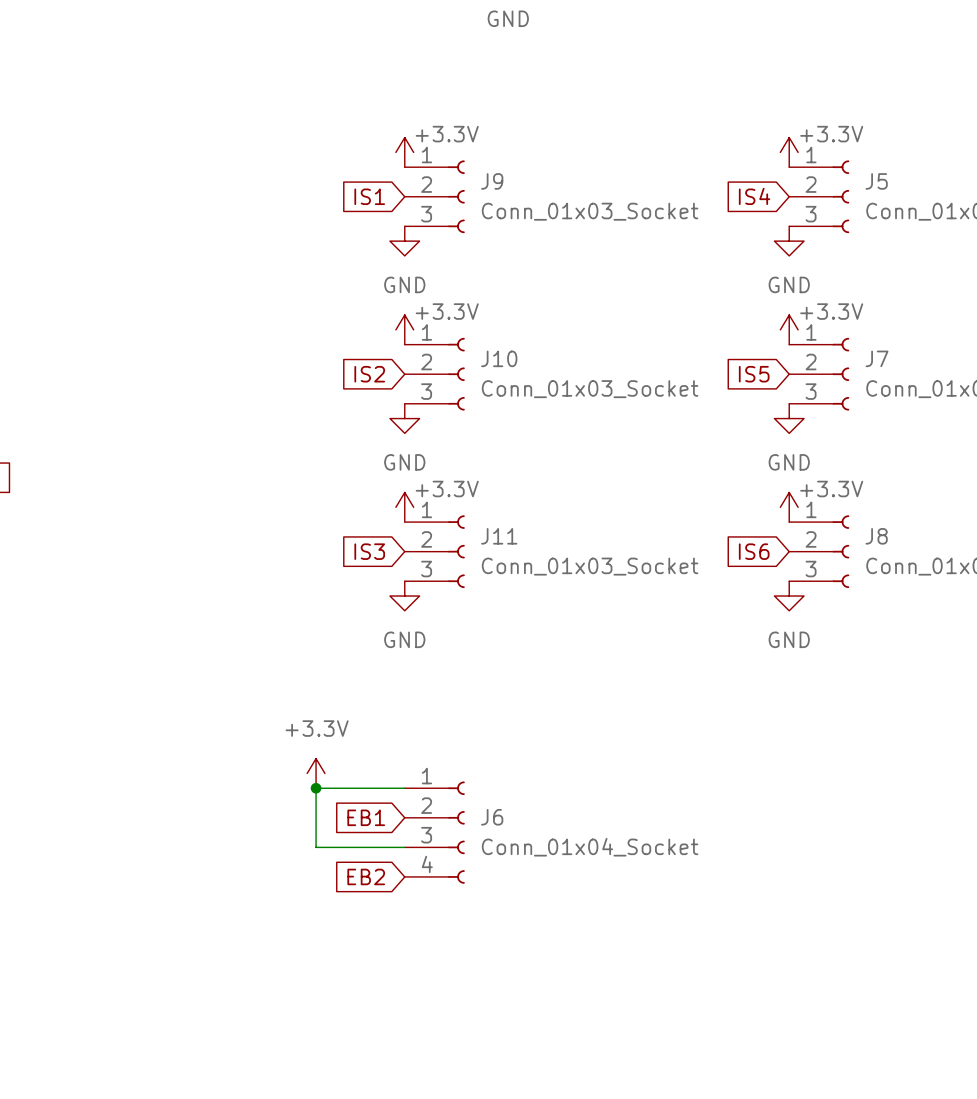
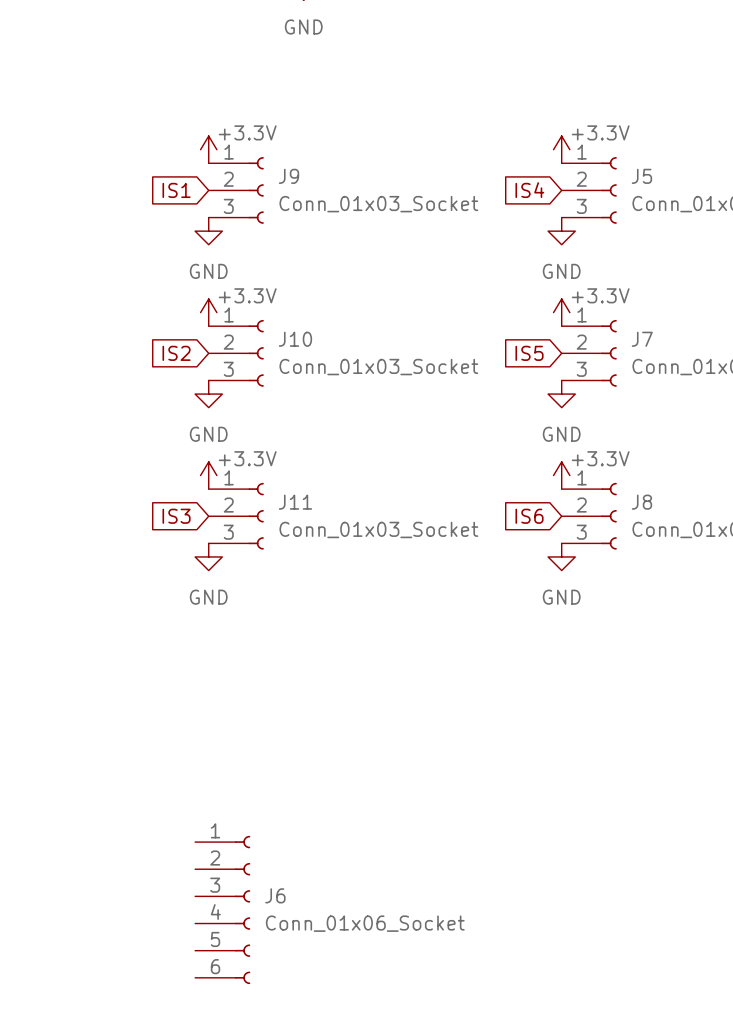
power symbol: +3.3V (316, 773) -> none
J6 symbol: [404, 781, 465, 884] -> [195, 835, 251, 985]
junction: (316, 788) -> none
wire: (404, 788) (316, 788) (316, 847) (404, 847) -> none
global label: EB1 (366, 817) -> none
J6 value: Conn_01x04_Socket (590, 847) -> Conn_01x06_Socket (365, 923)
global label: EB2 (366, 876) -> none

